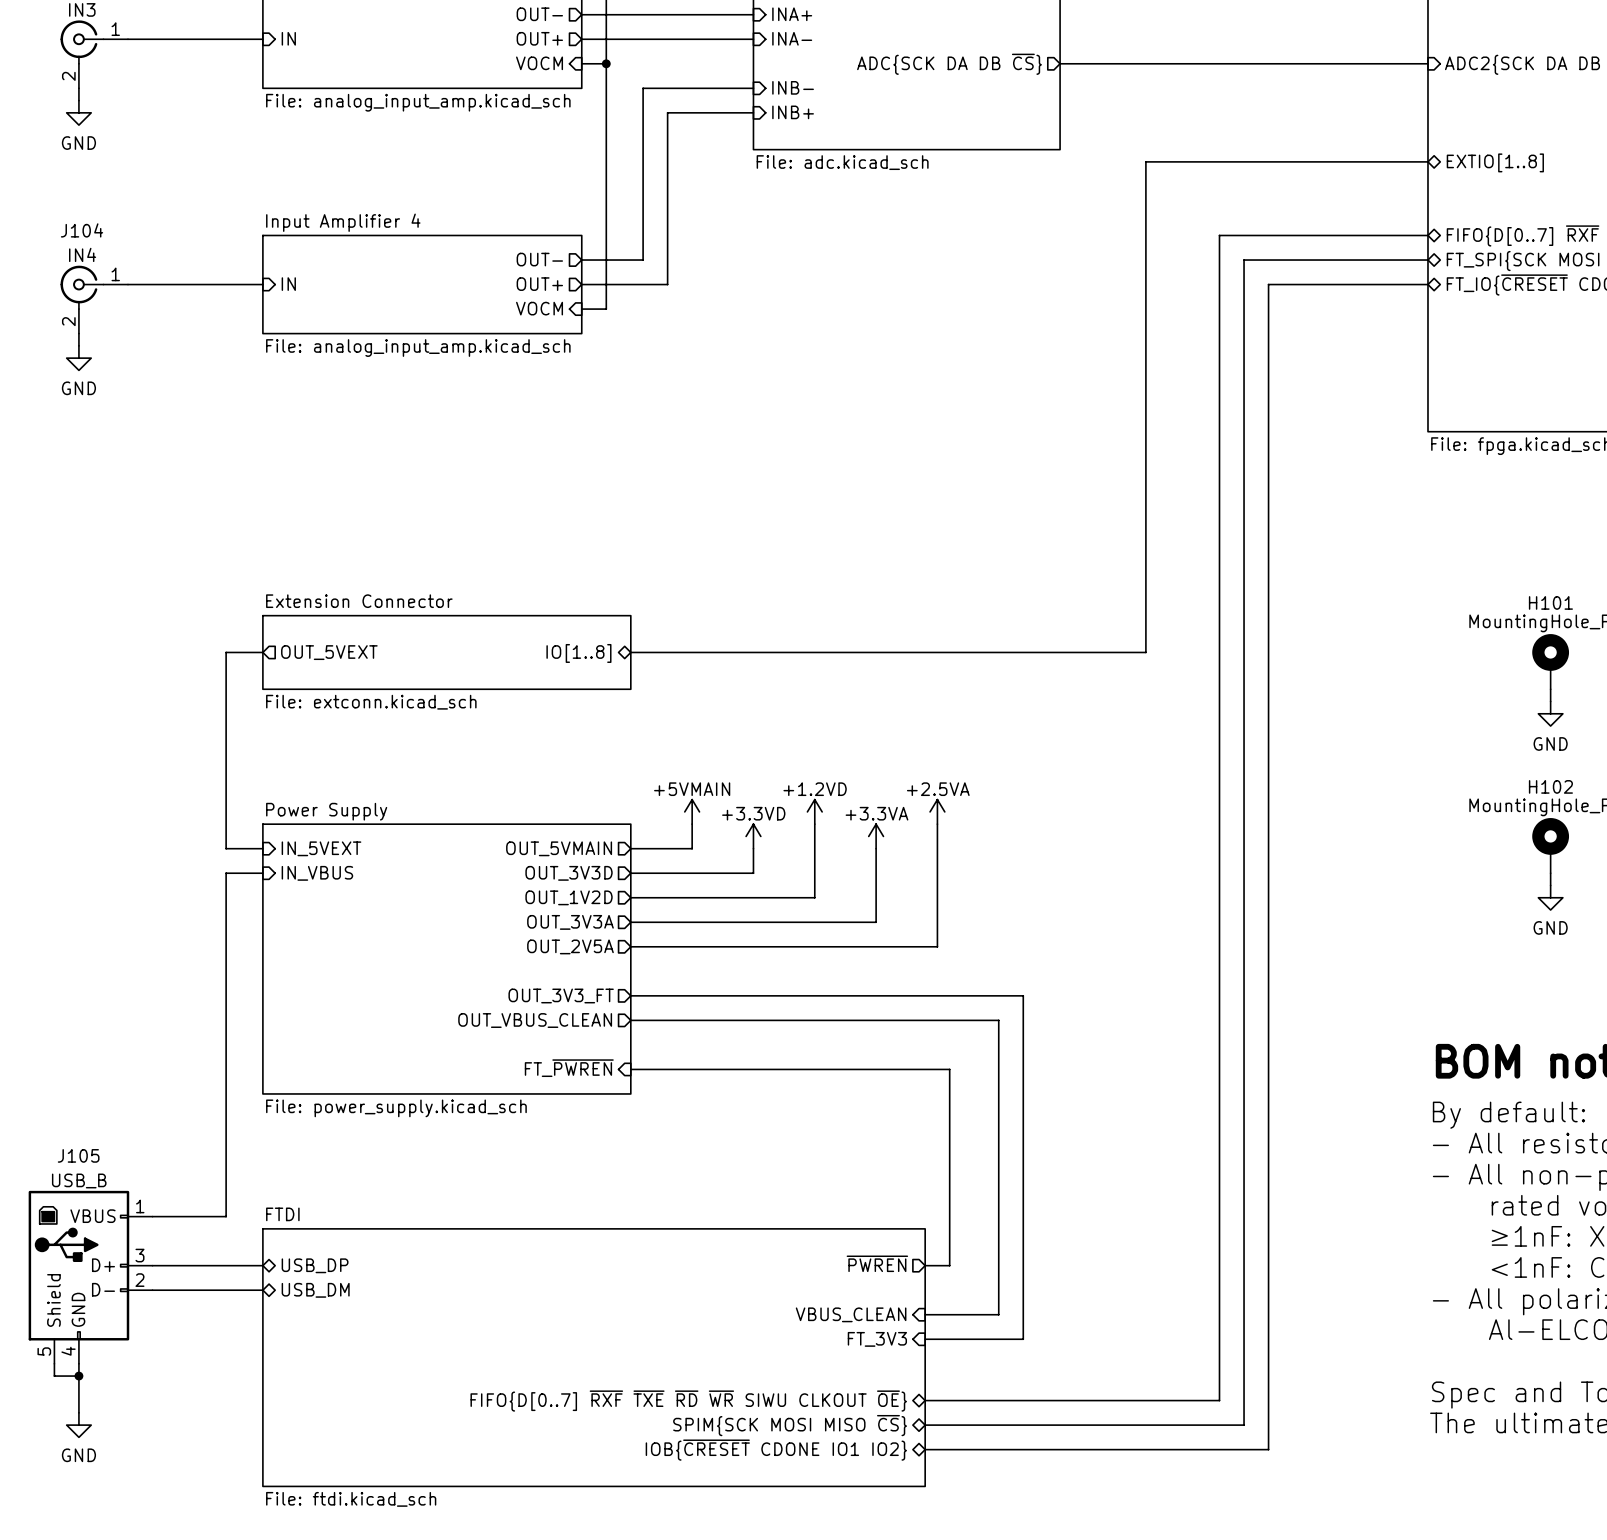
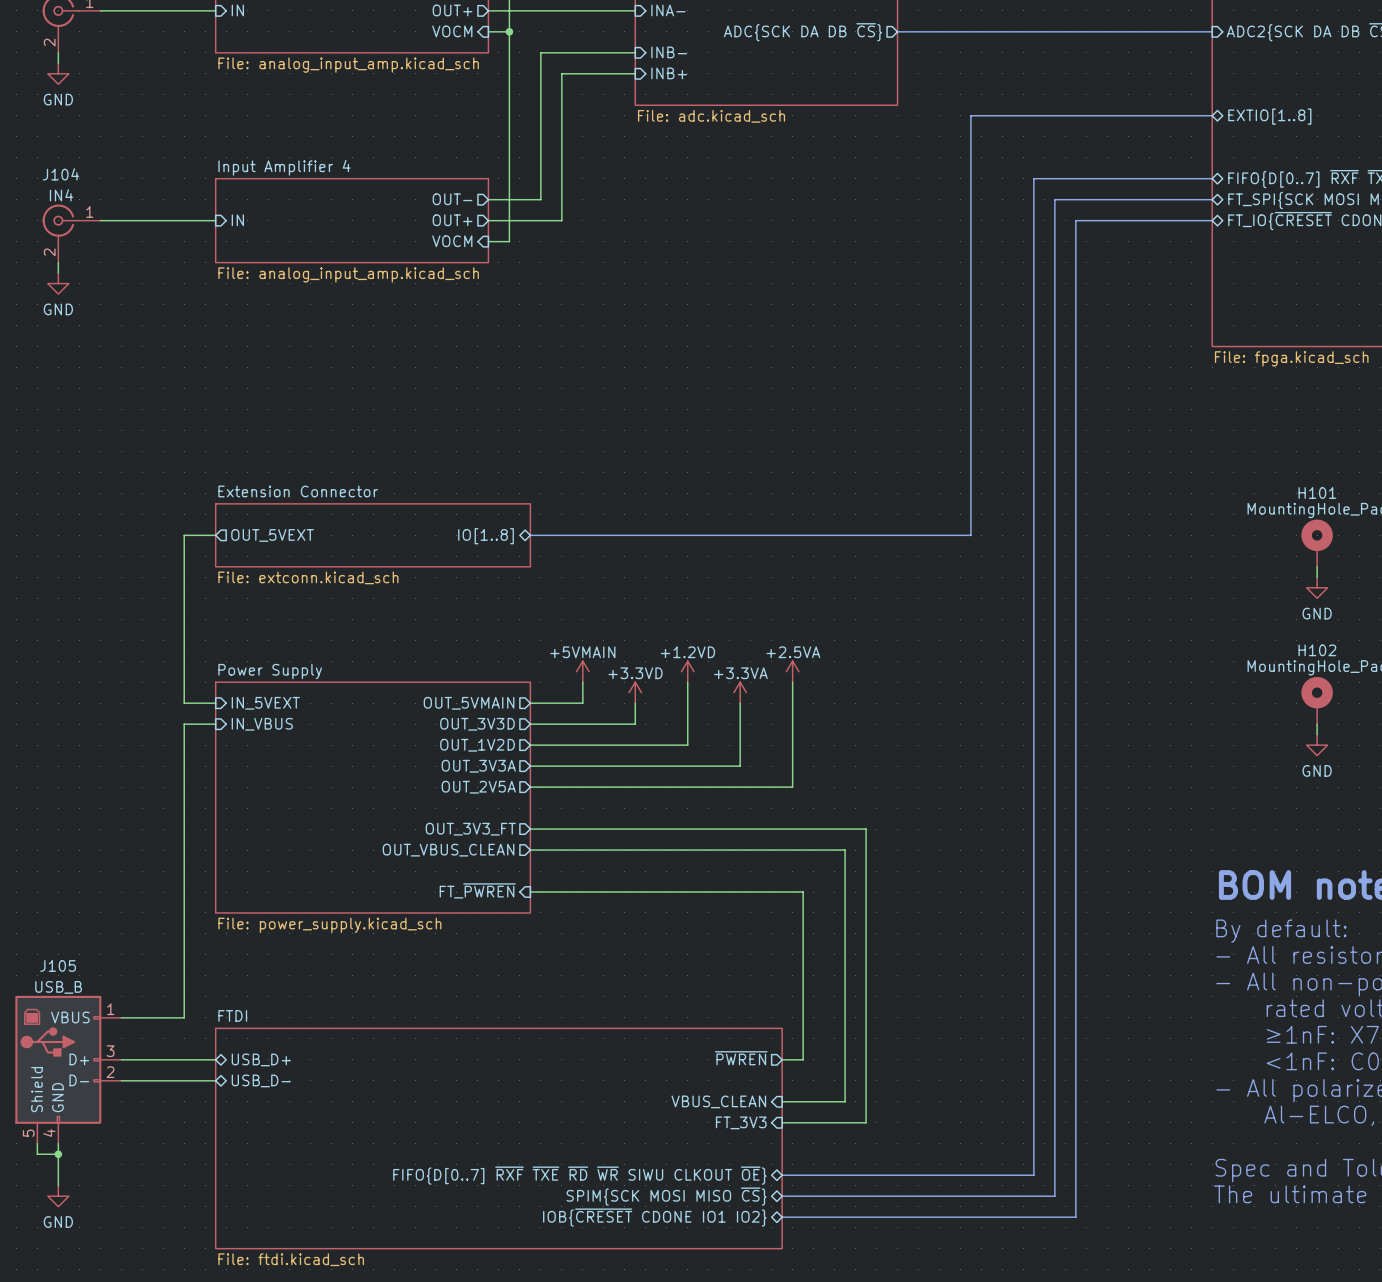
sheet pin: USB_DP (315, 1265) -> USB_D+ (261, 1059)
sheet pin: USB_DM (315, 1290) -> USB_D- (261, 1080)

